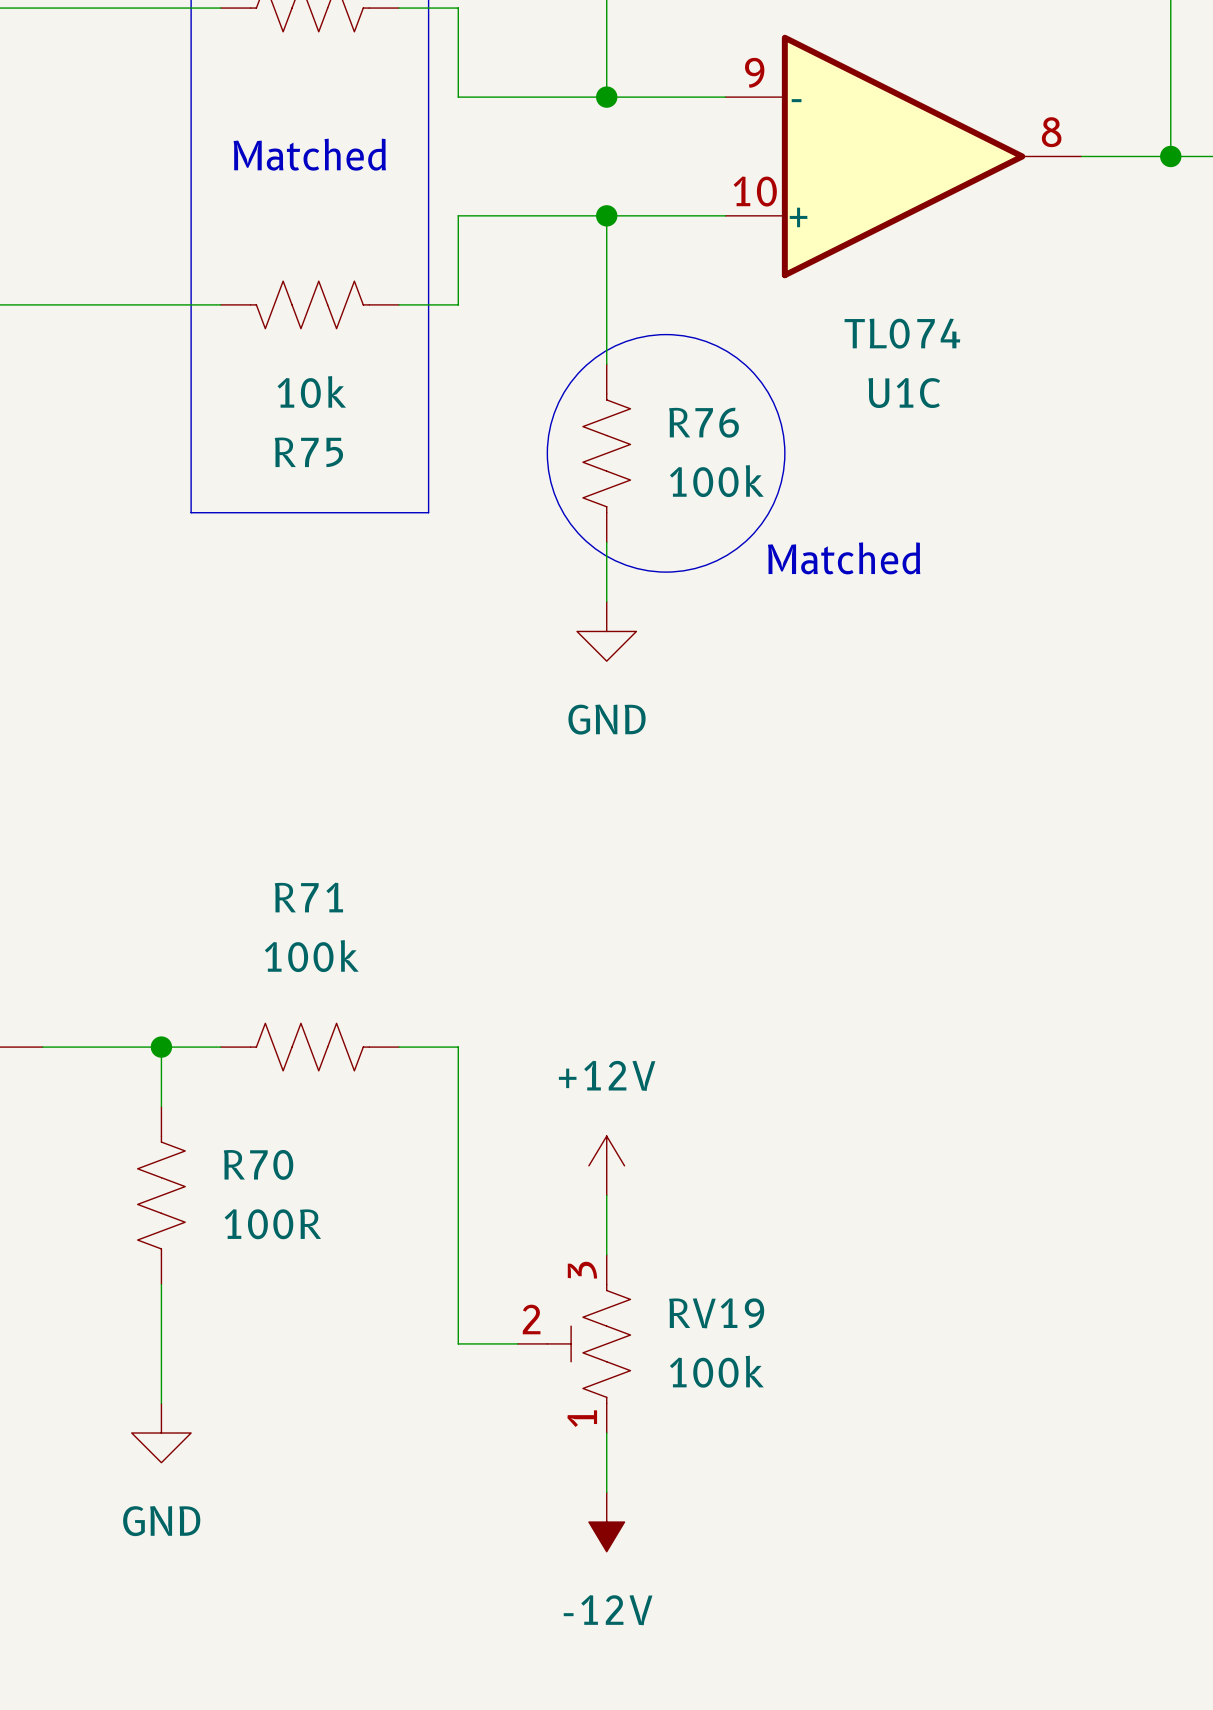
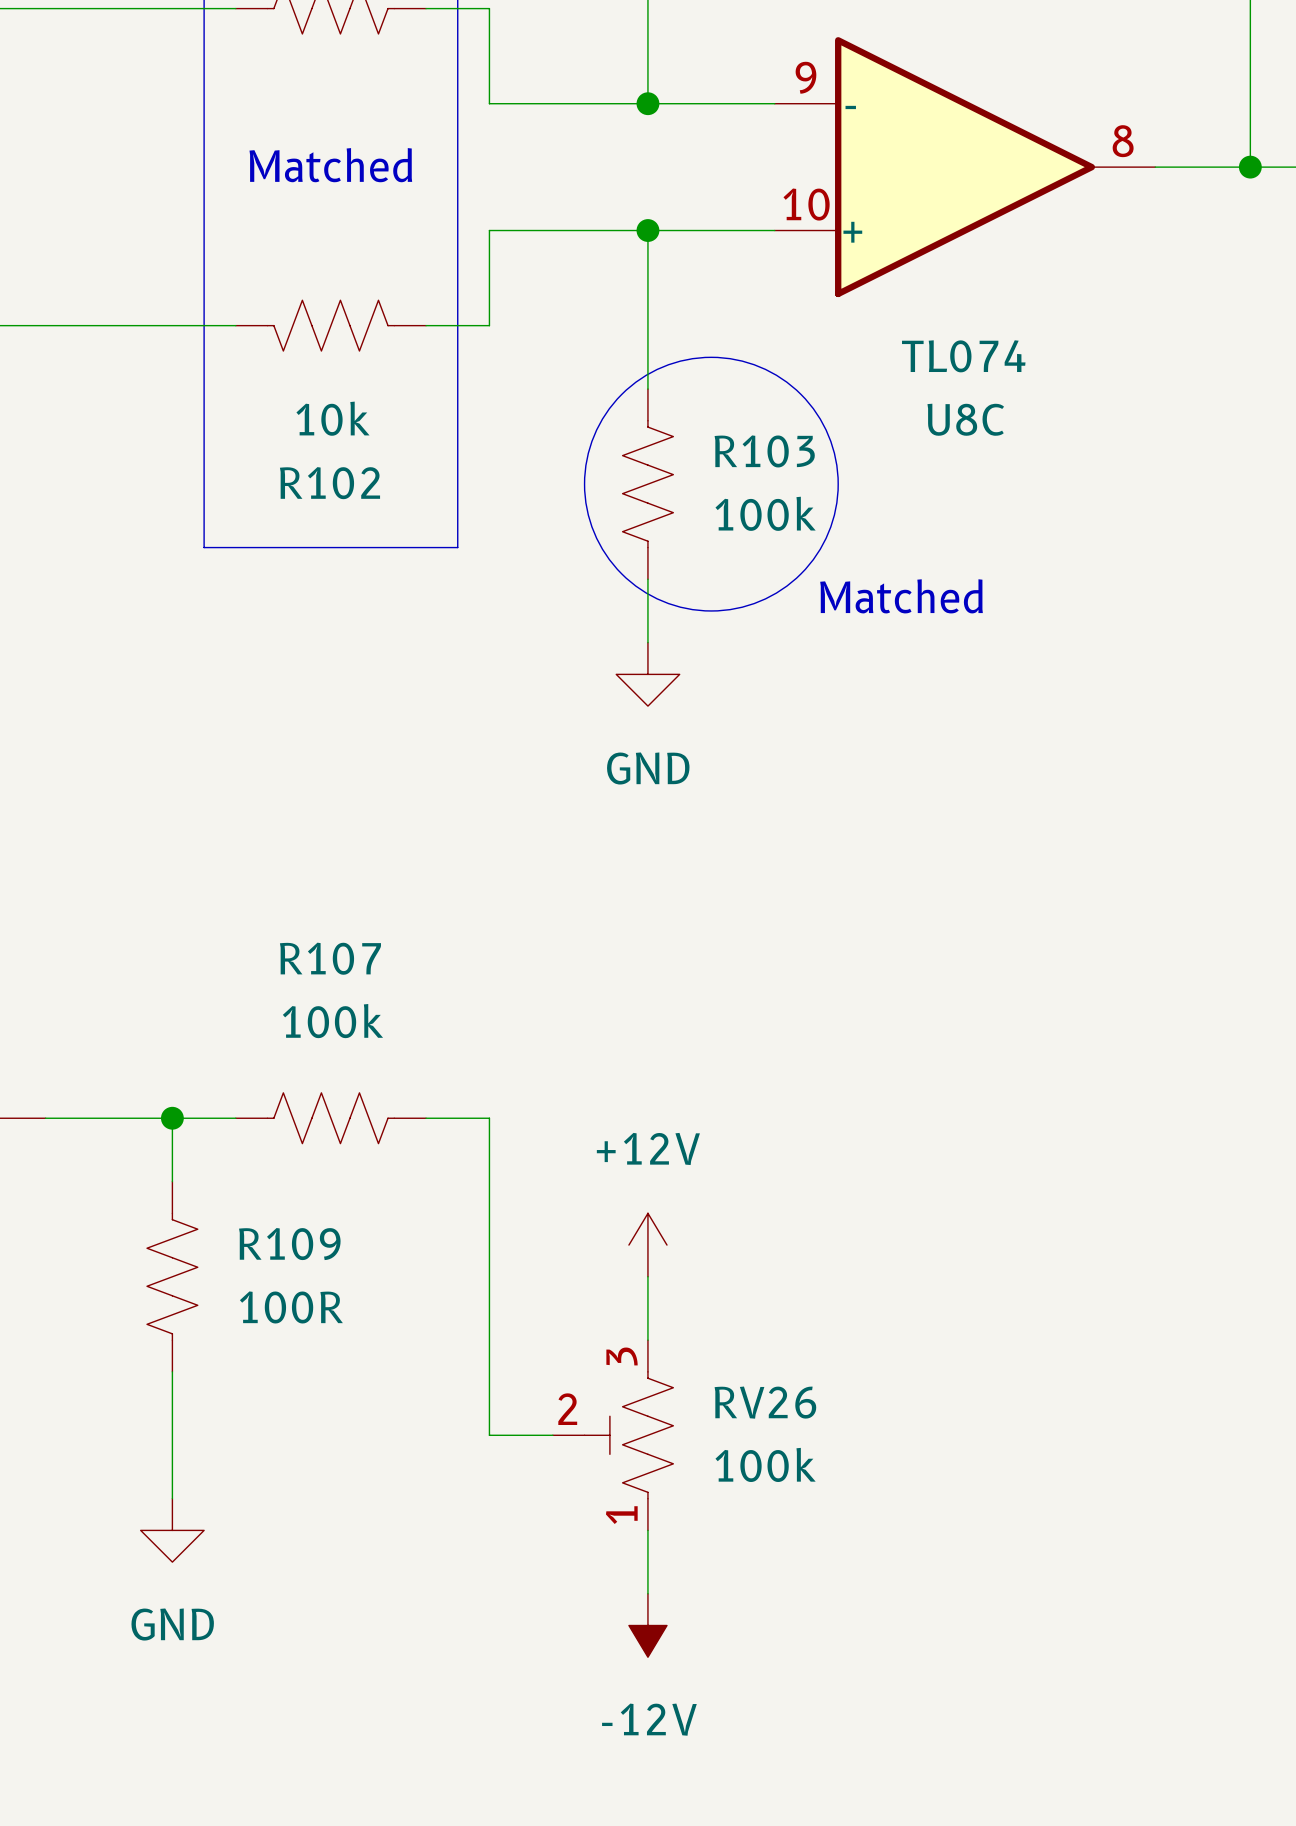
U1C name: U1C (904, 393) -> U8C (965, 419)
R76 name: R76 (704, 422) -> R103 (764, 451)
R75 name: R75 (308, 452) -> R102 (329, 483)
R71 name: R71 (308, 897) -> R107 (330, 958)
R70 name: R70 (258, 1164) -> R109 (289, 1244)
RV19 name: RV19 (716, 1313) -> RV26 (765, 1402)

